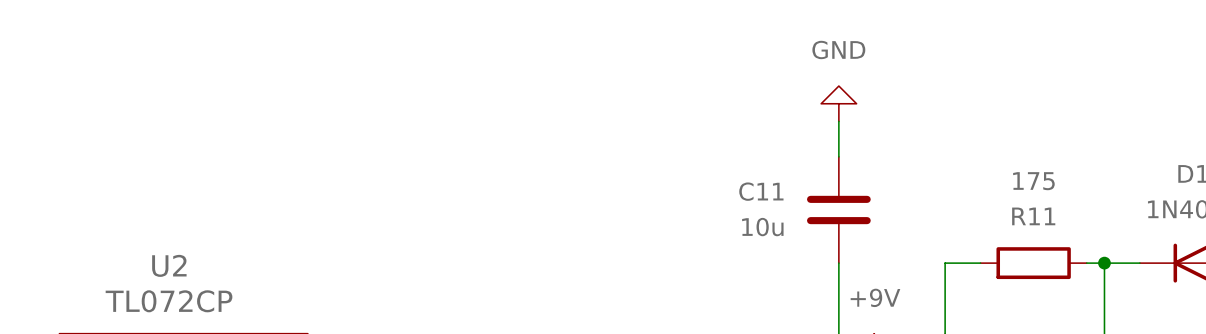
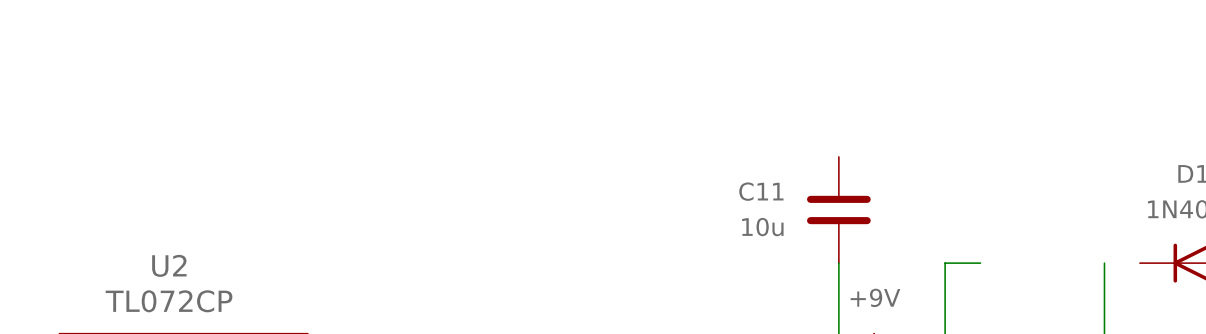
power symbol: GND (838, 103) -> none
wire: (838, 121) (838, 156) -> none
R11: 175 (1033, 263) -> none
wire: (1086, 263) (1139, 263) -> none
junction: (1104, 263) -> none

